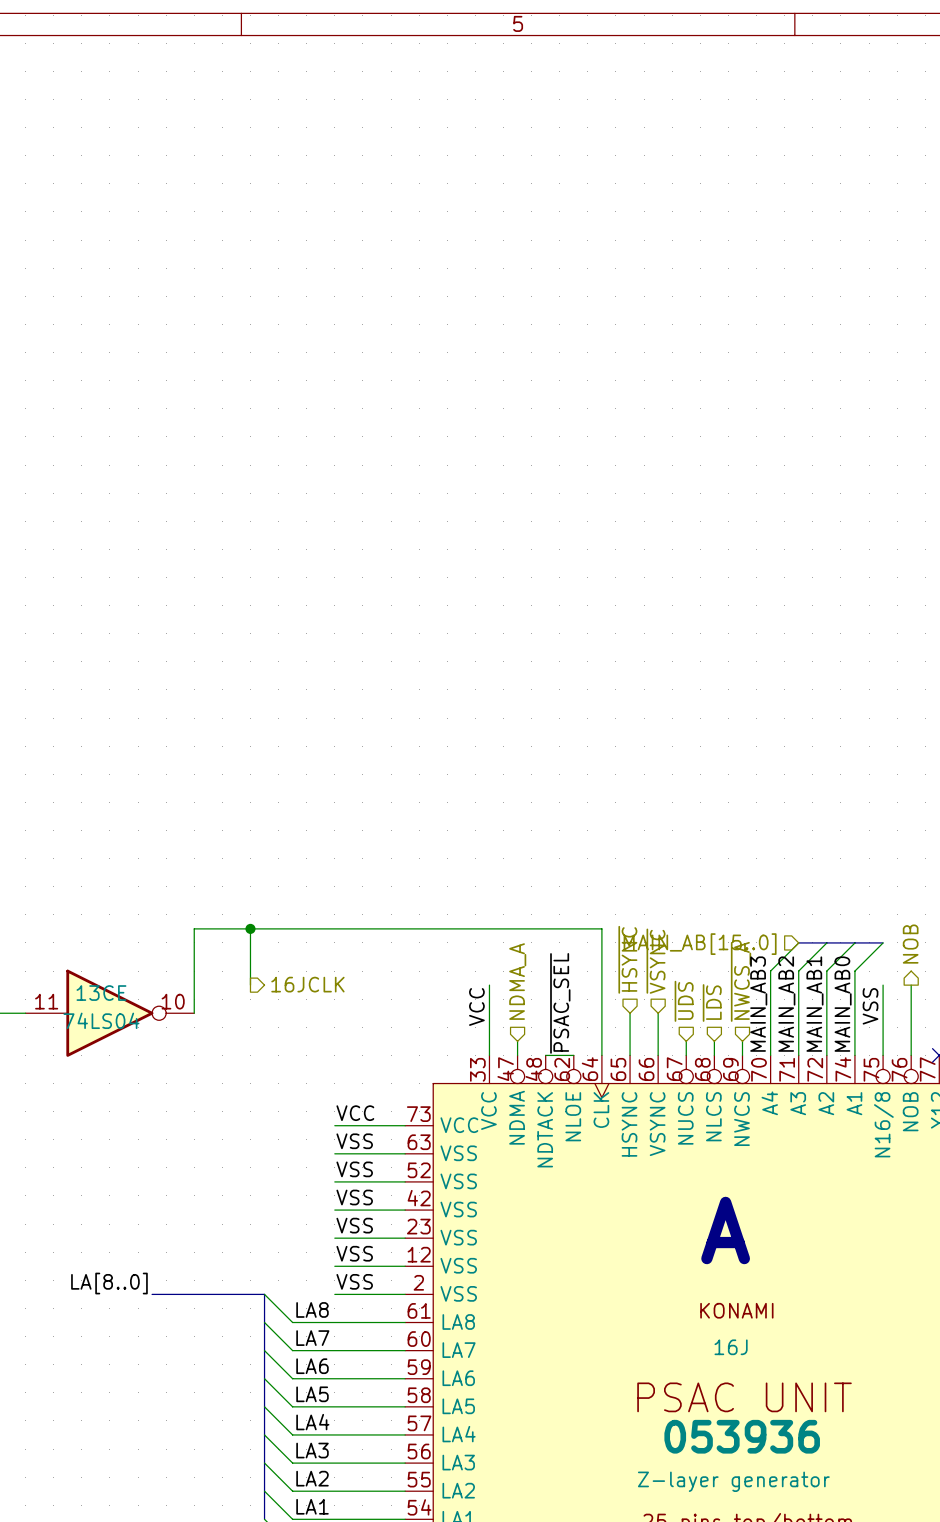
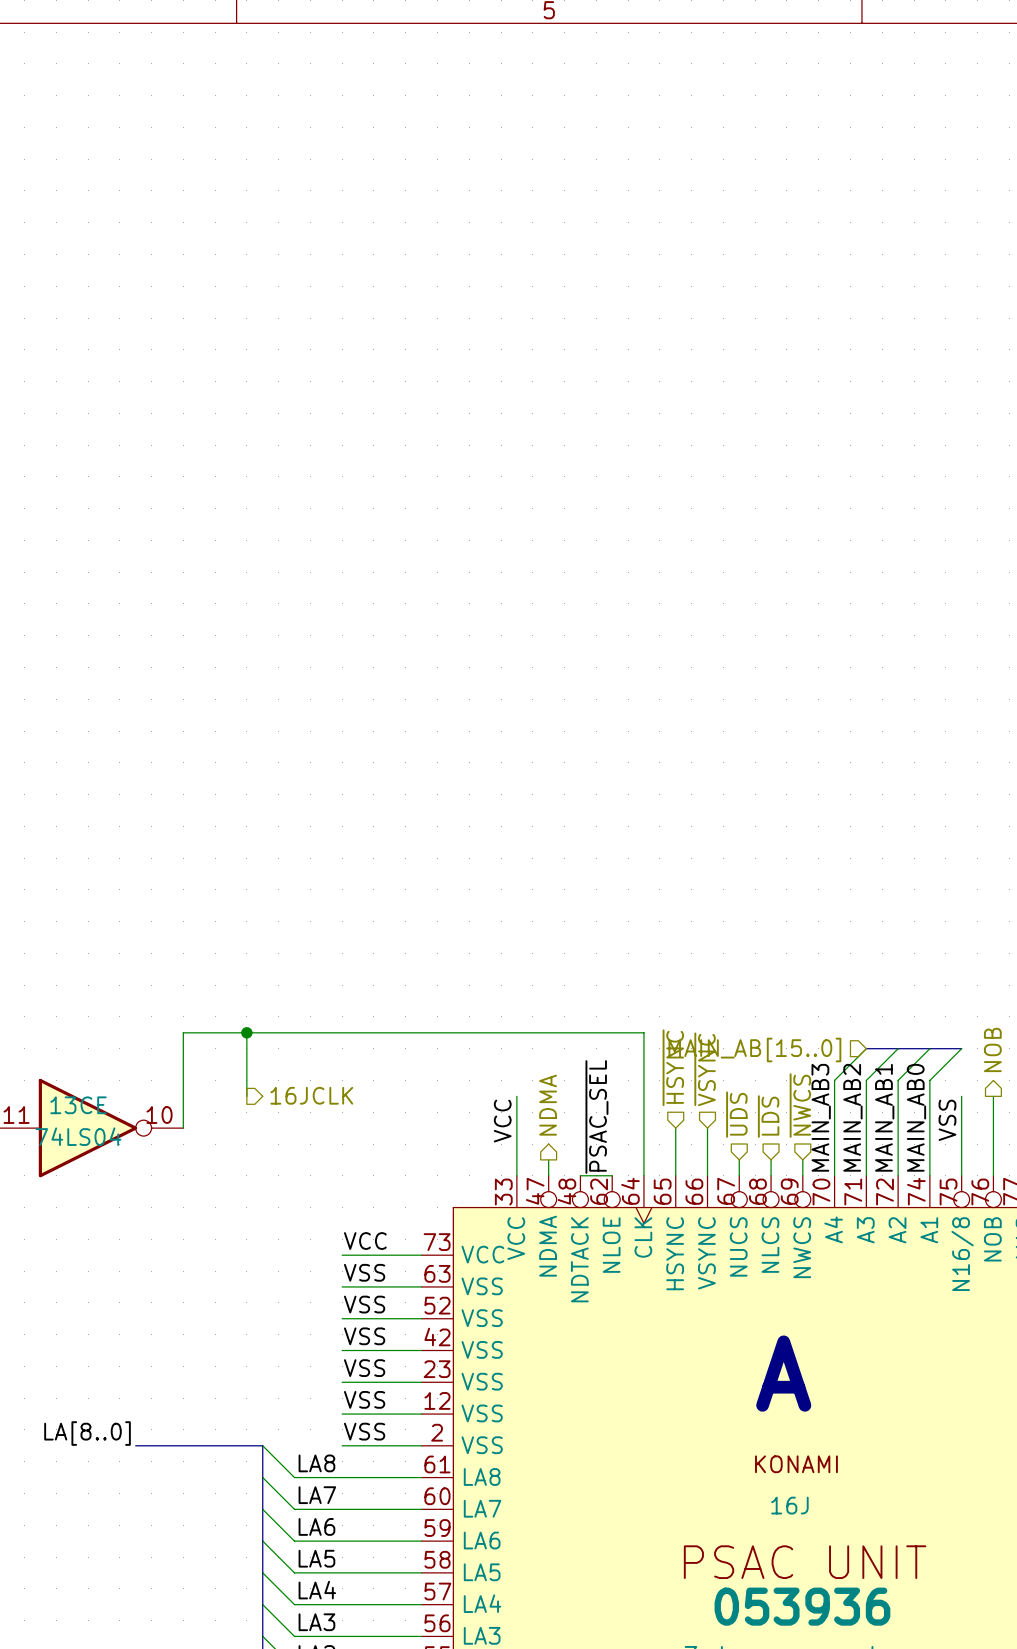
hierarchical label shape: input (517, 981) -> output (548, 1105)
hierarchical label: NDMA_A (517, 981) -> NDMA (548, 1105)
hierarchical label: ~{NWCS_A} (741, 981) -> ~{NWCS} (800, 1105)

